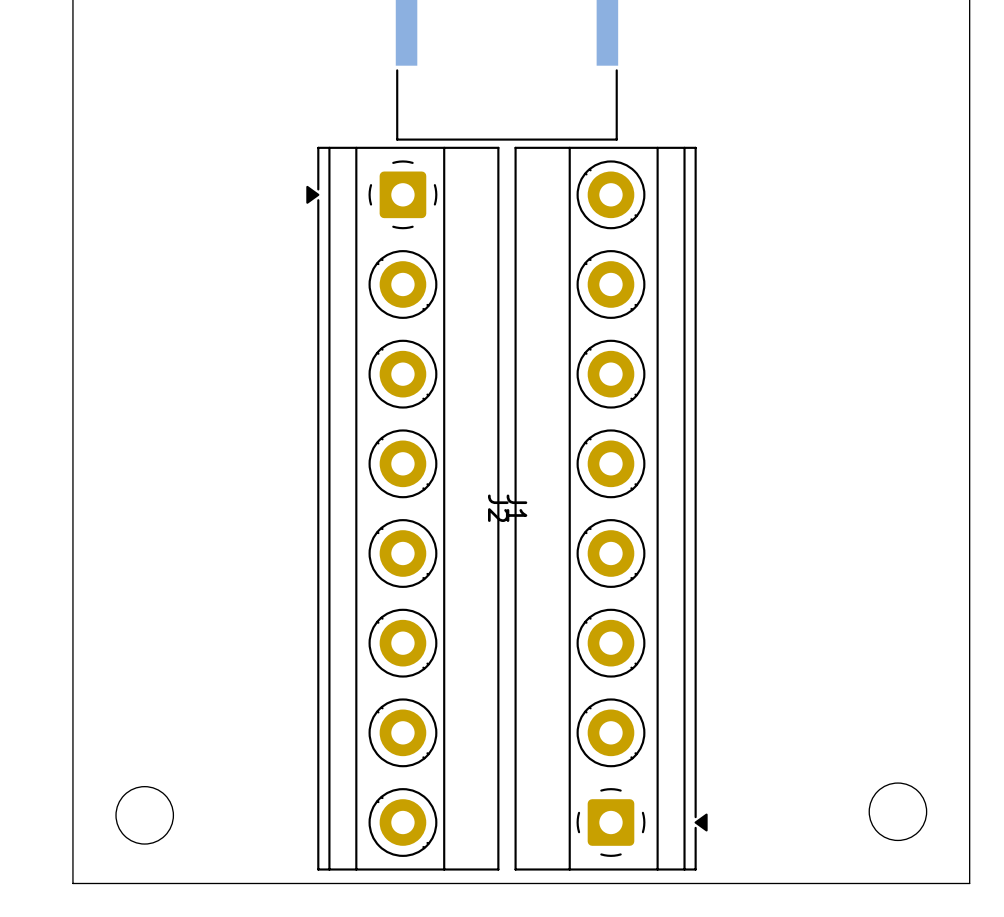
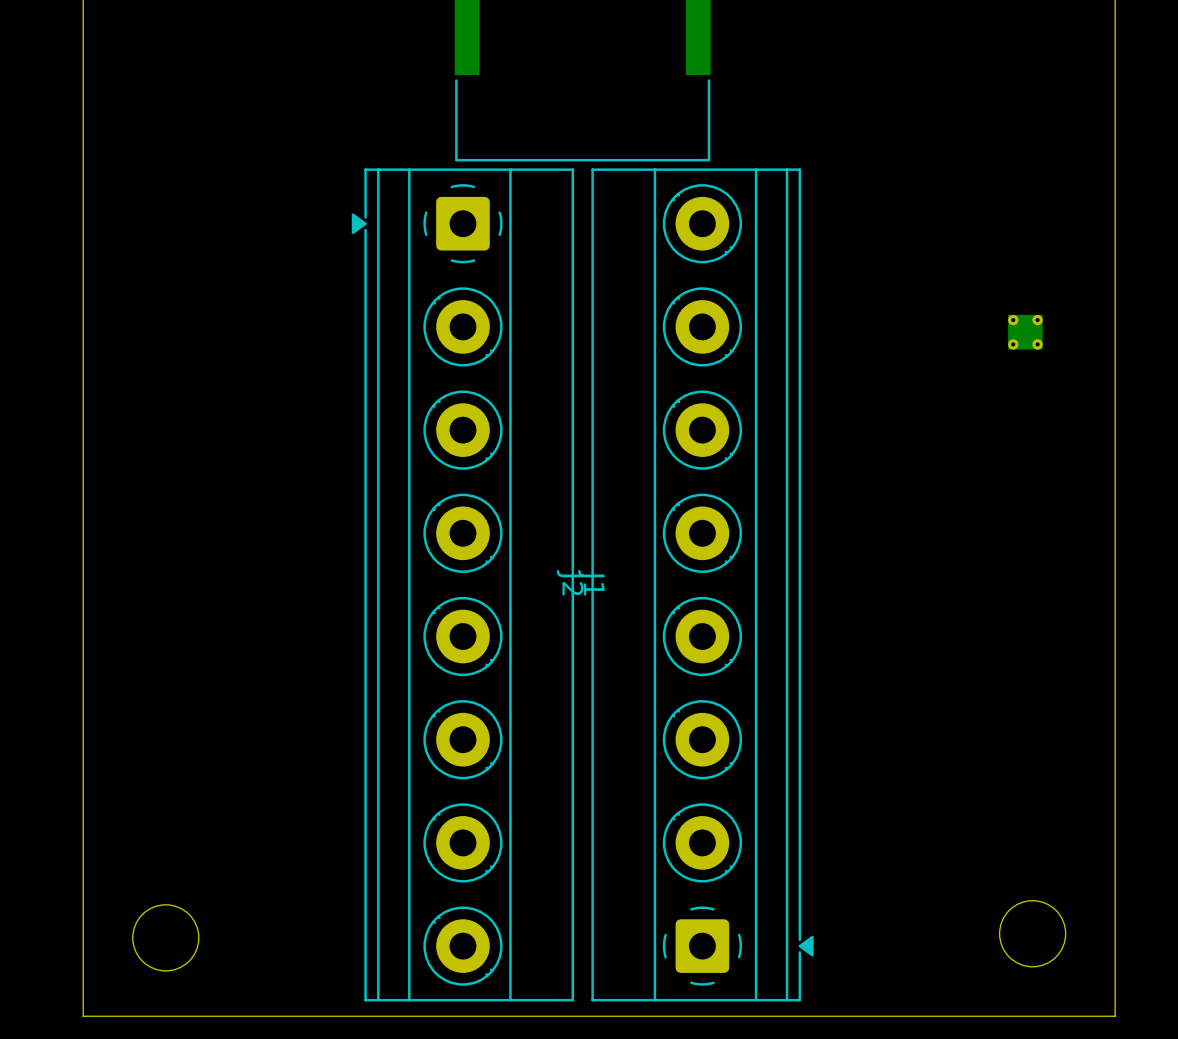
part: none -> (1025, 332)

